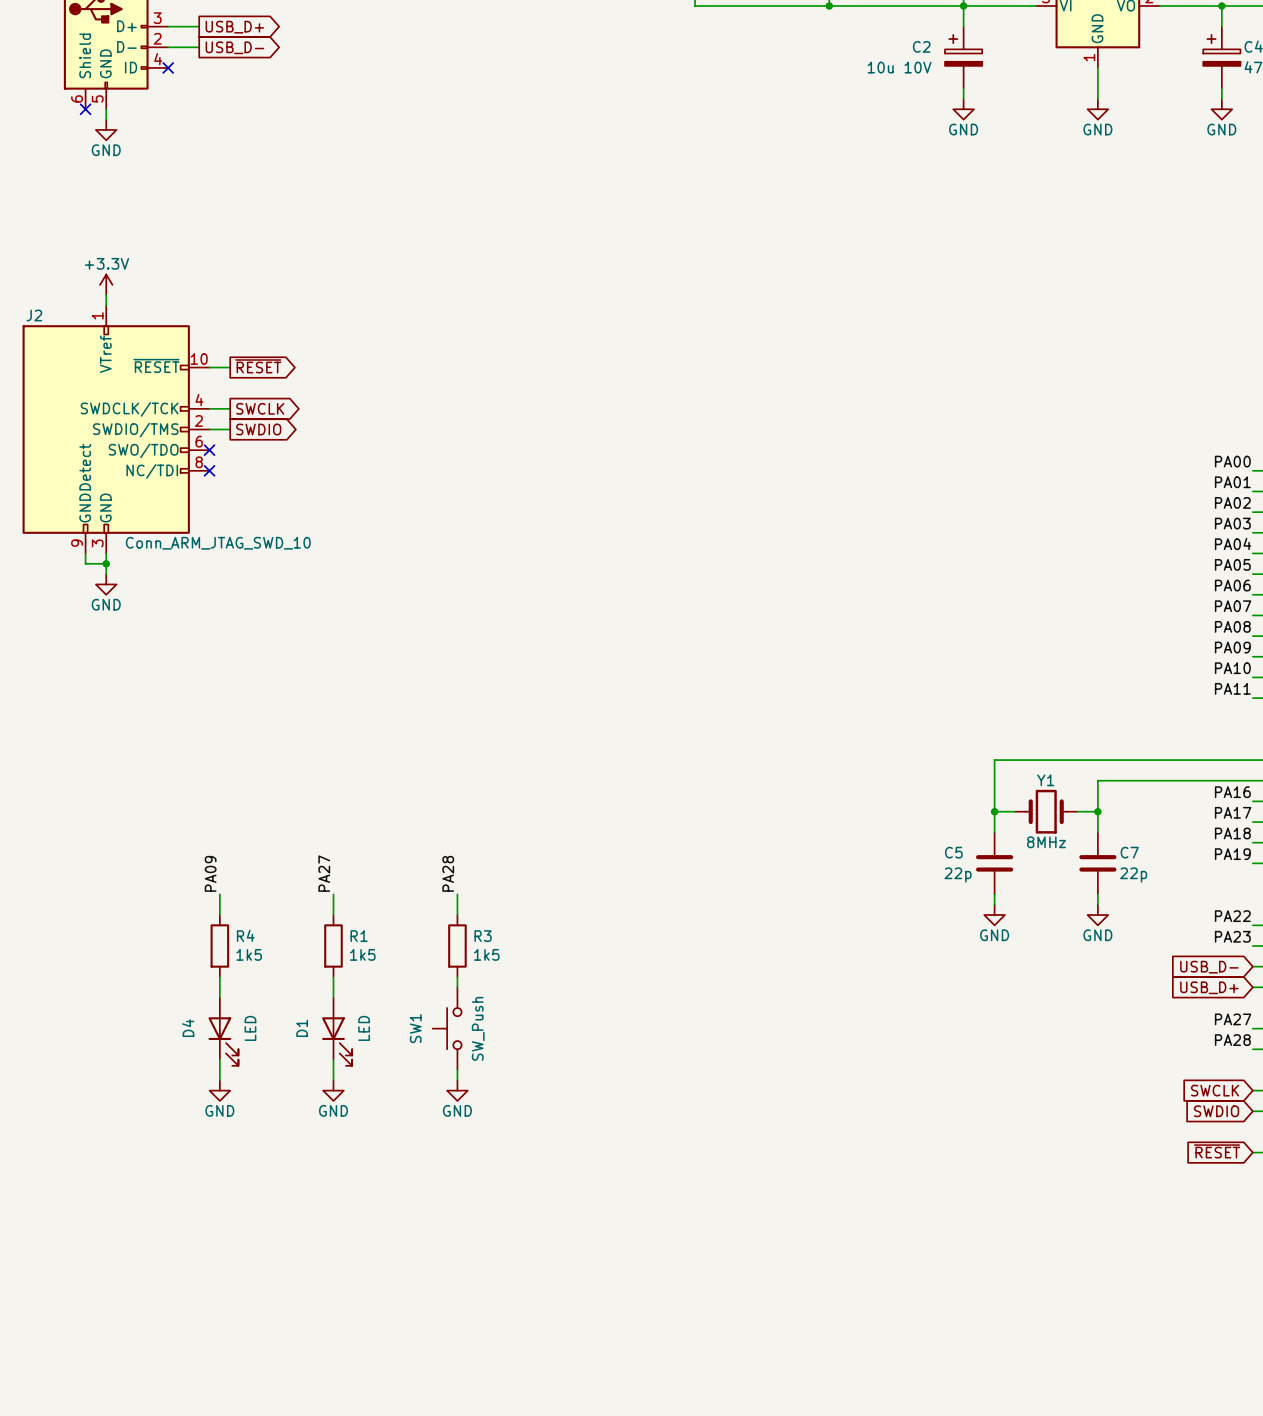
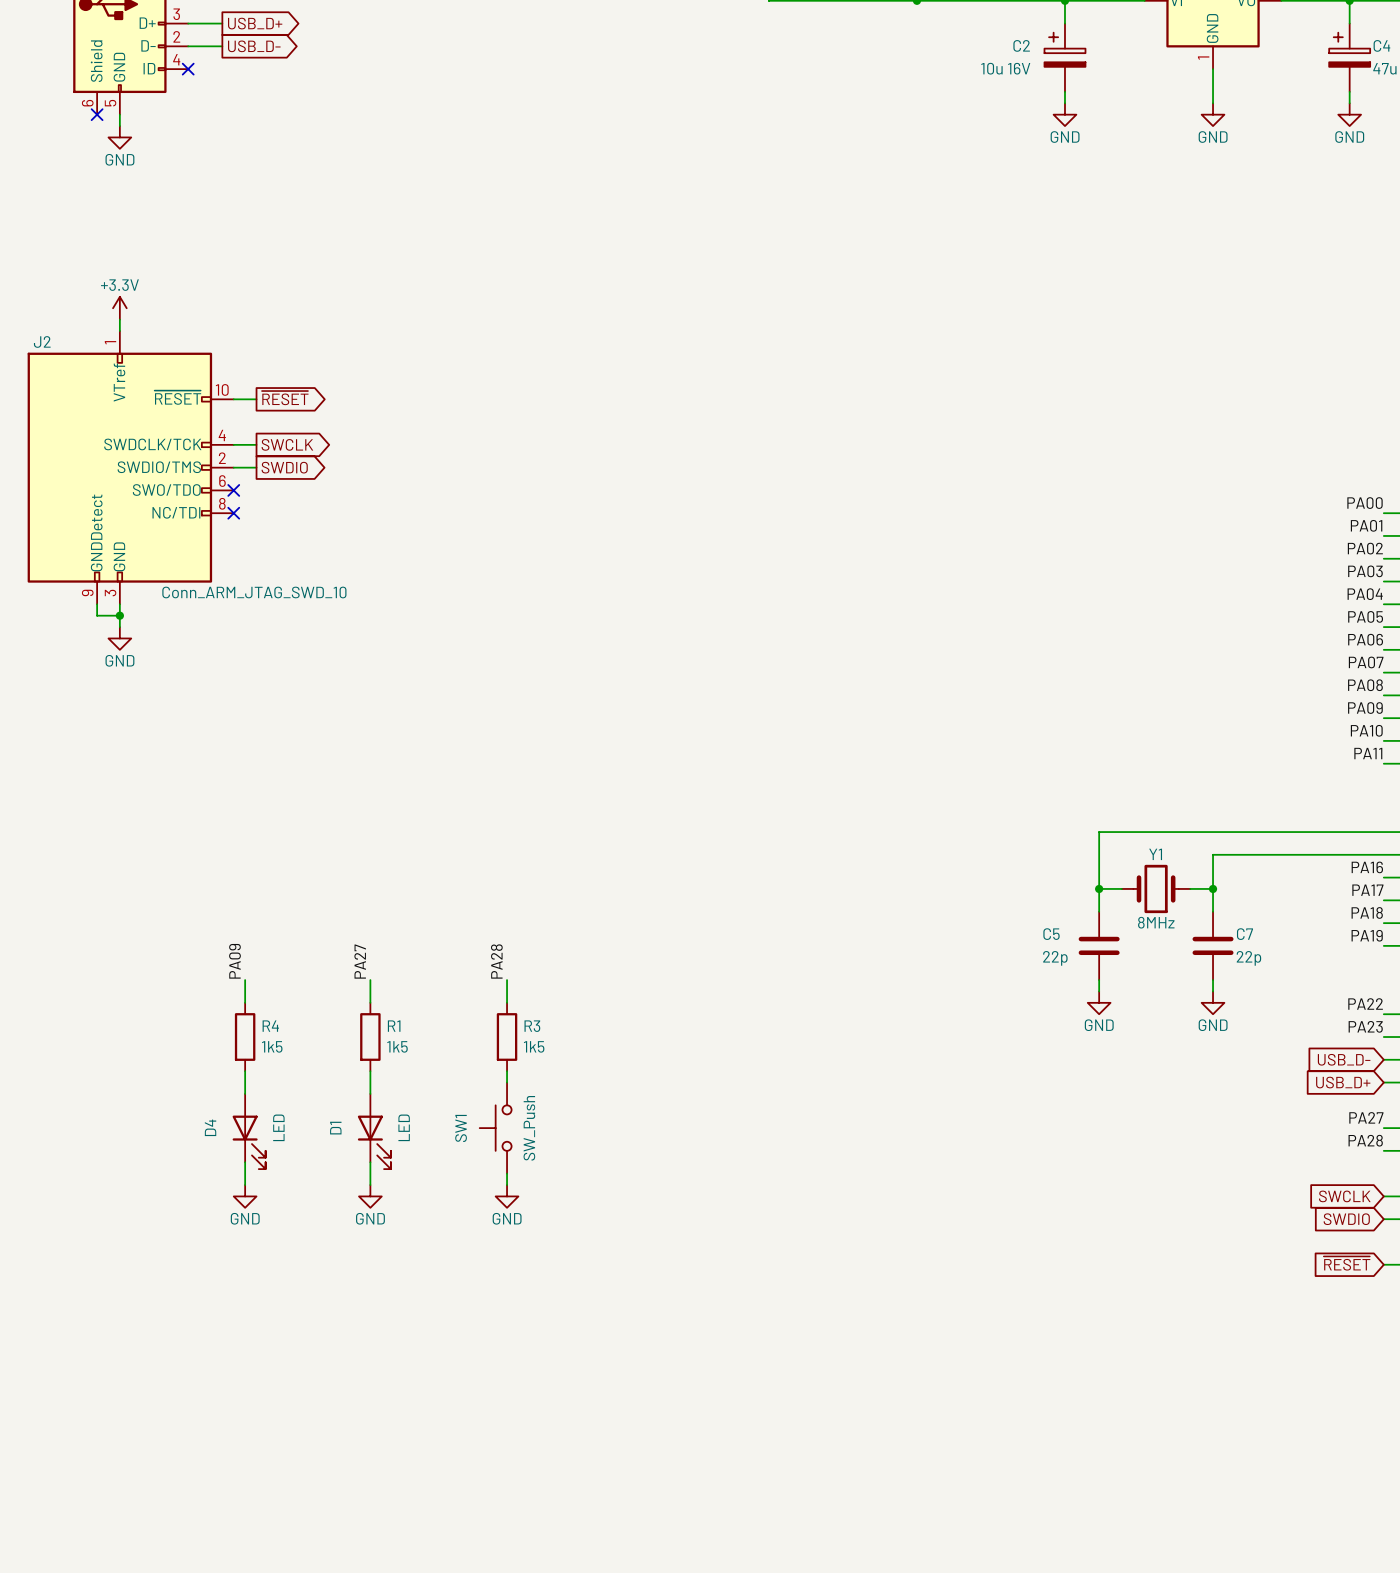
C2 value: 10u 10V (899, 67) -> 10u 16V (1005, 68)

